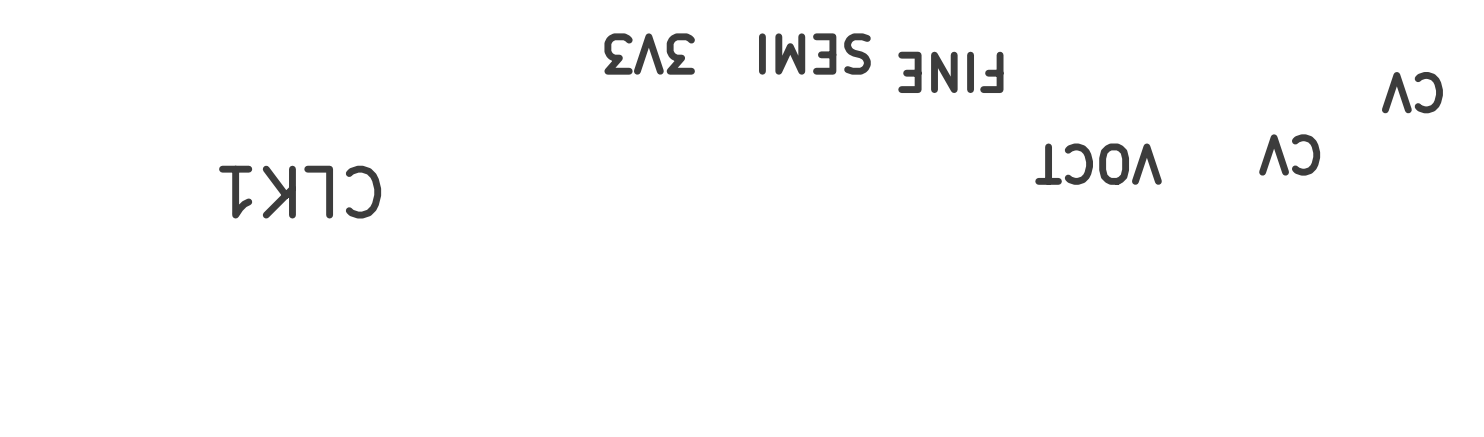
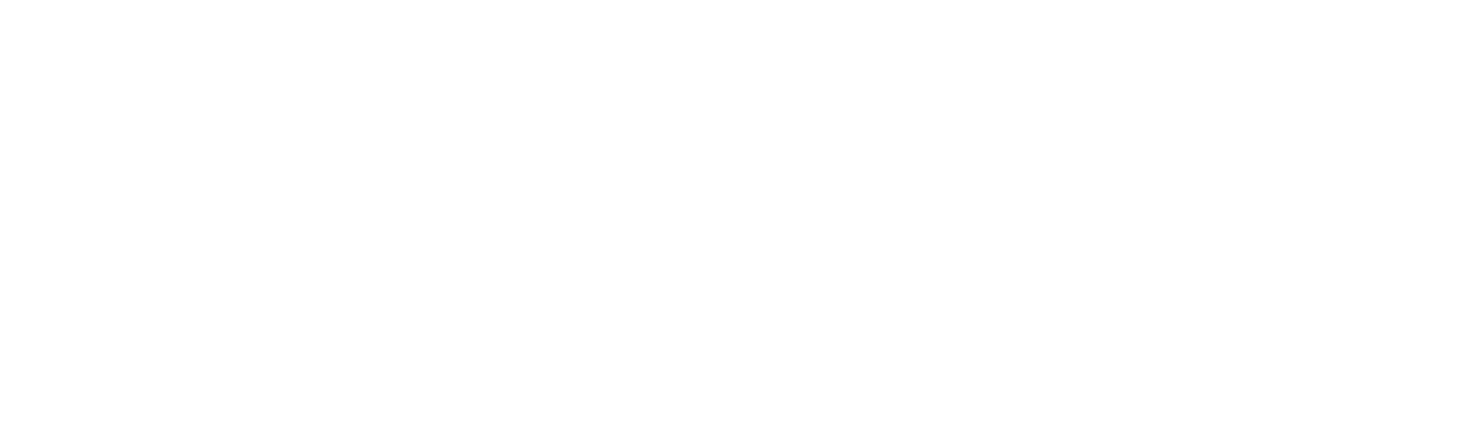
text: 3V3 (649, 54) -> none
text: SEMI (814, 54) -> none
text: FINE (950, 72) -> none
text: CV (1412, 92) -> none
text: CV (1289, 154) -> none
text: VOCT (1098, 164) -> none
text: CLK1 (300, 192) -> none

